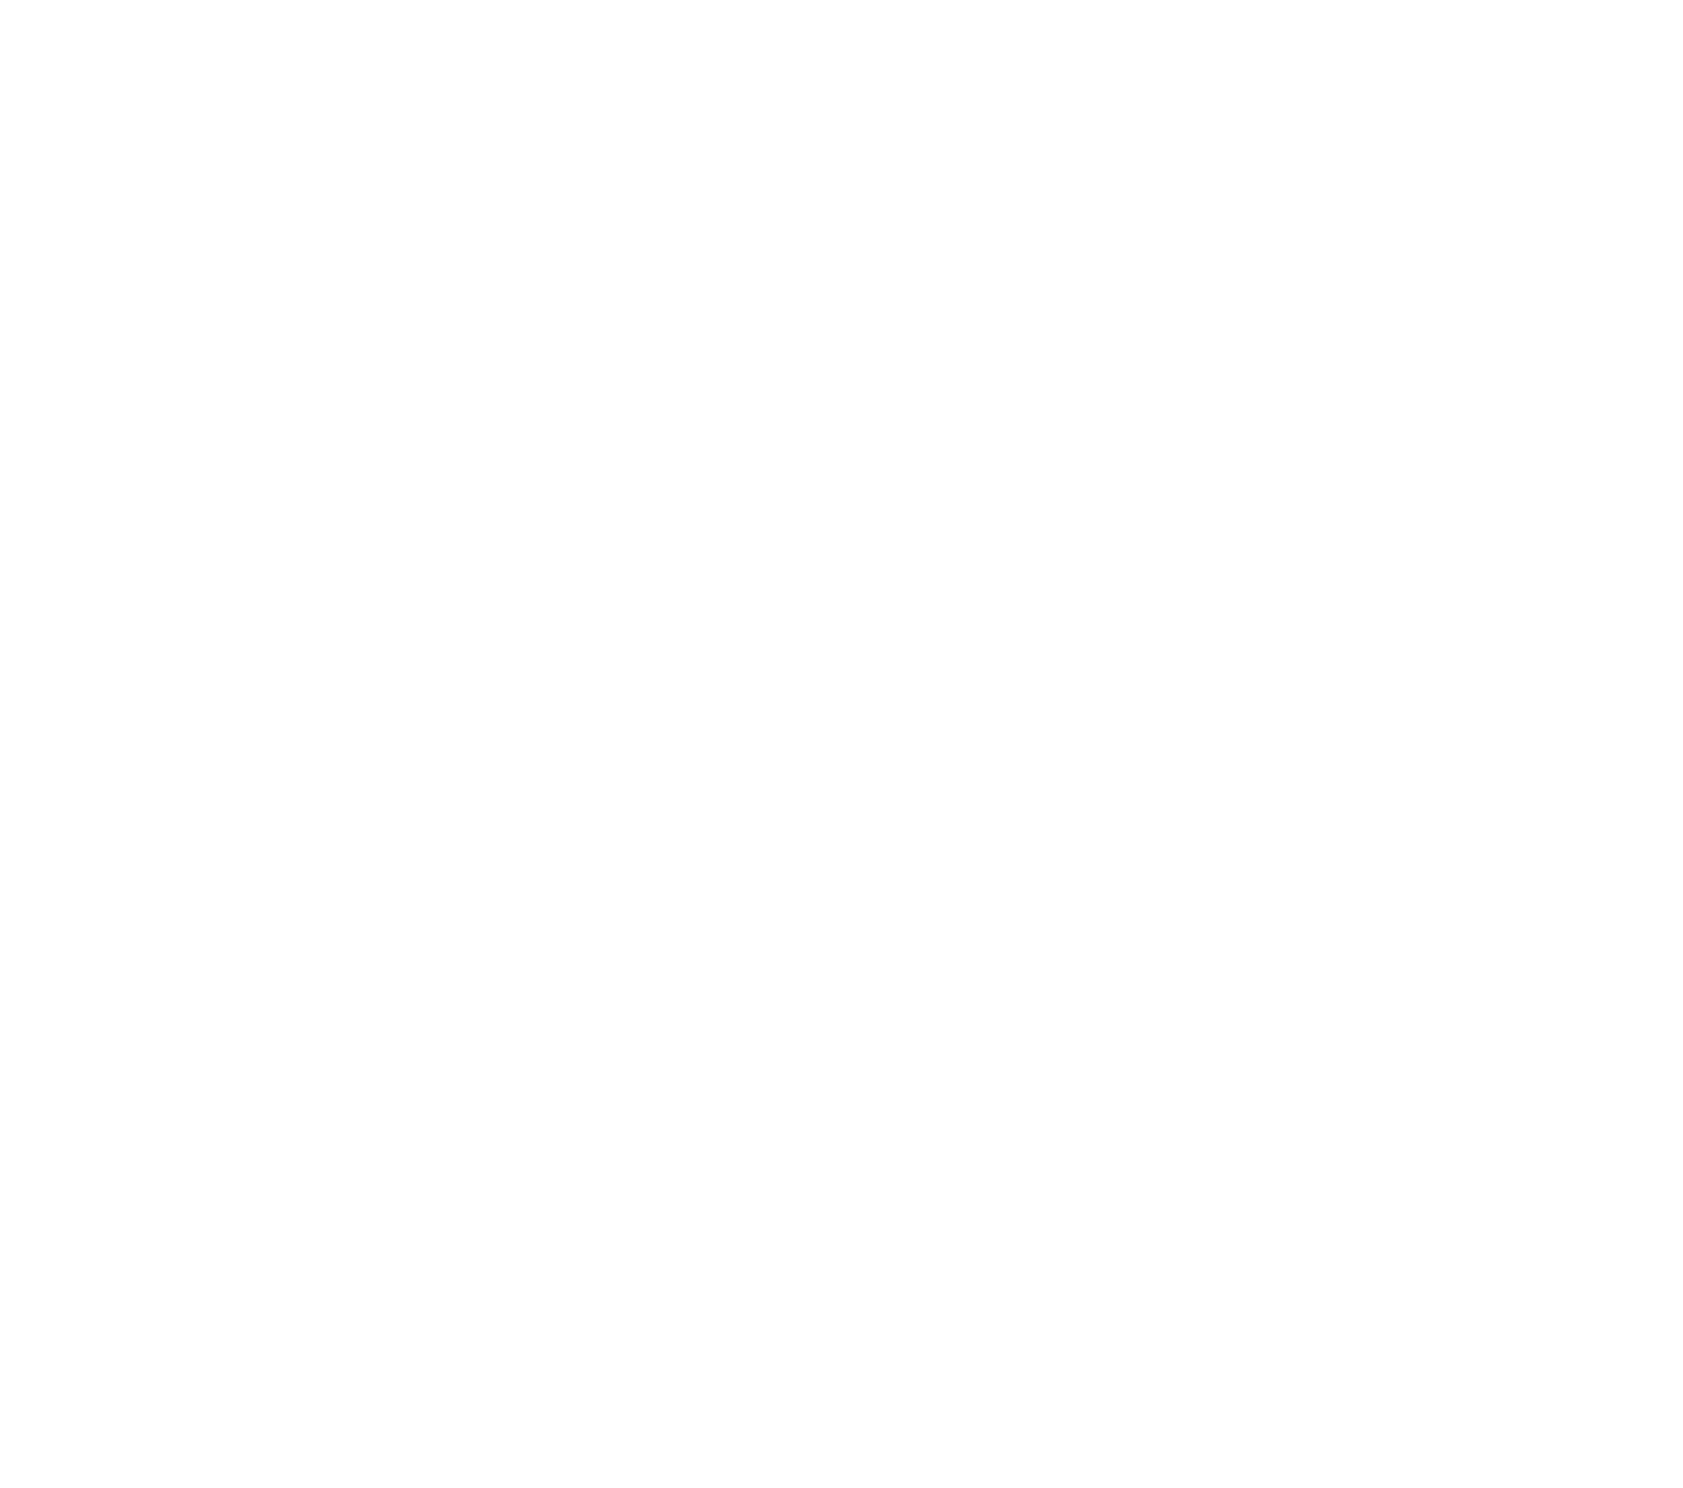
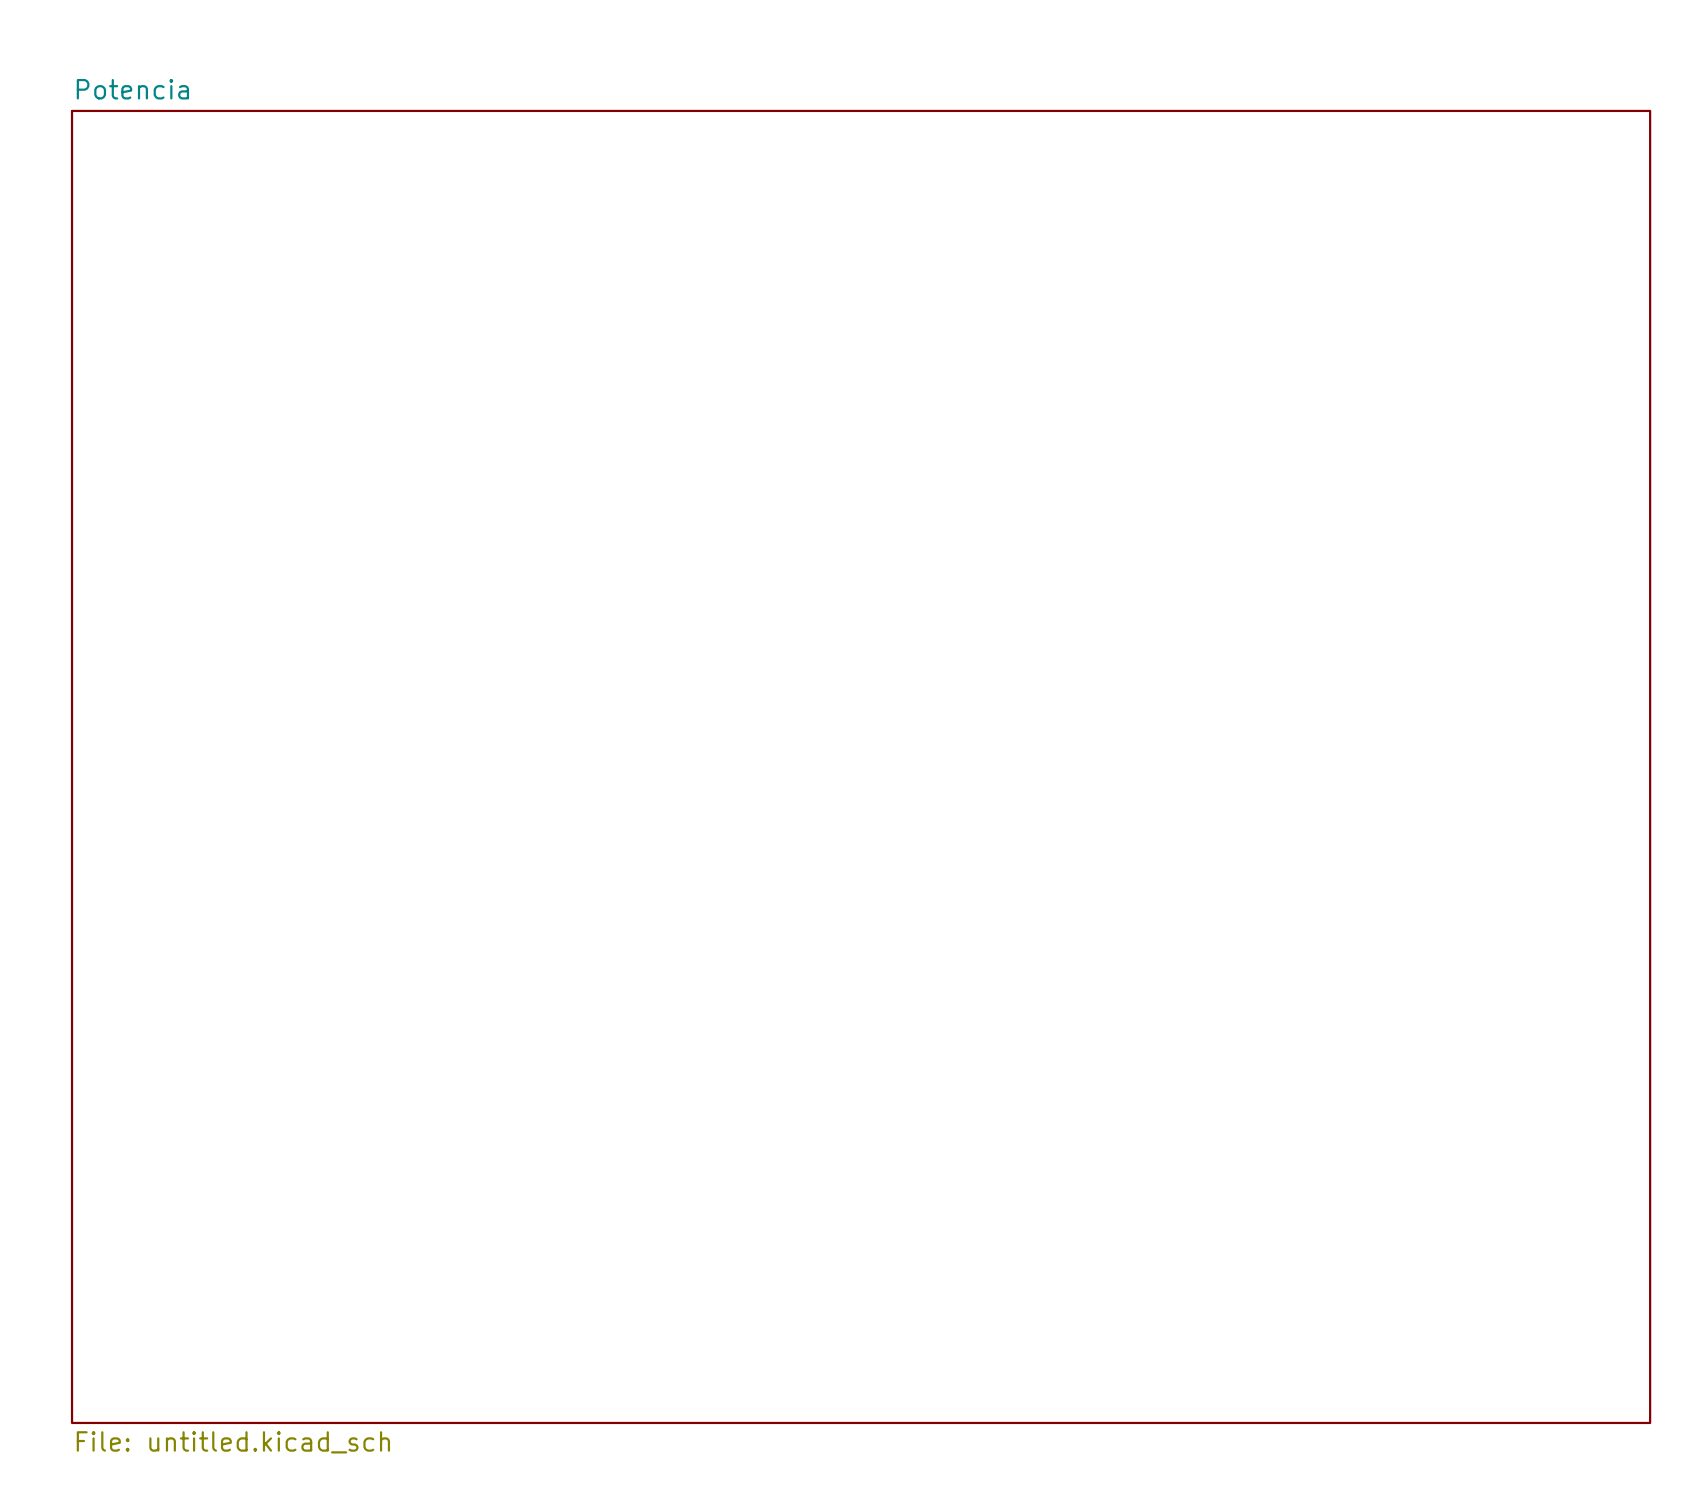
sheet Potencia: none -> File: untitled.kicad_sch (861, 766)

